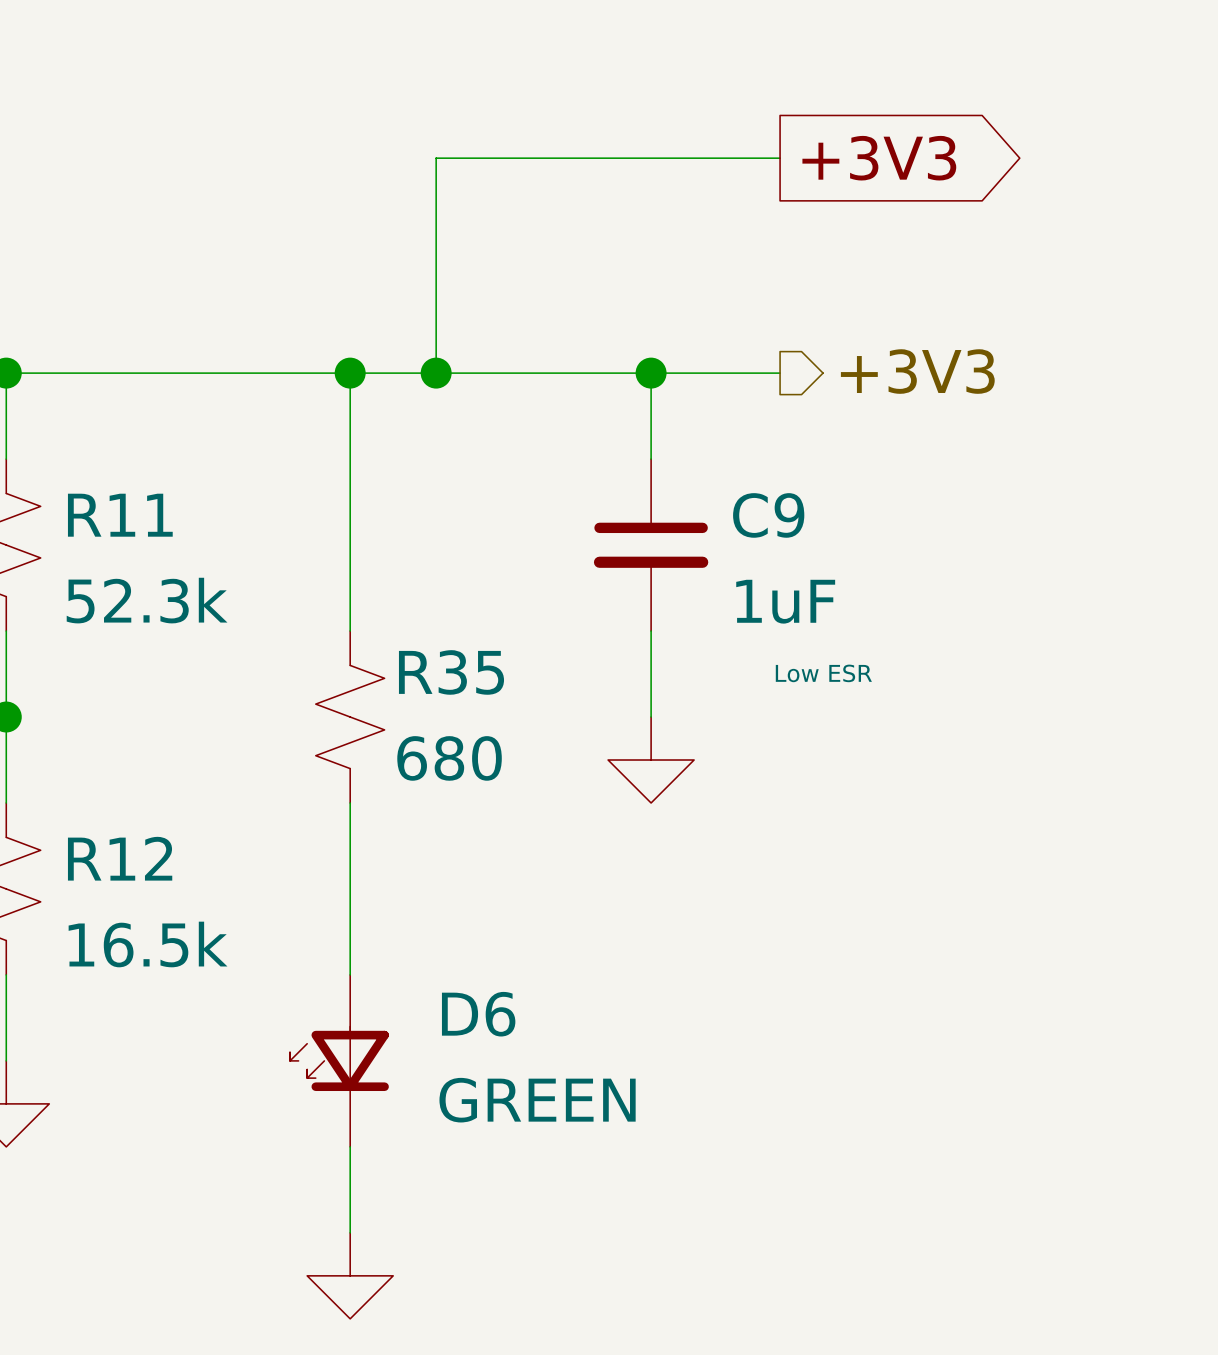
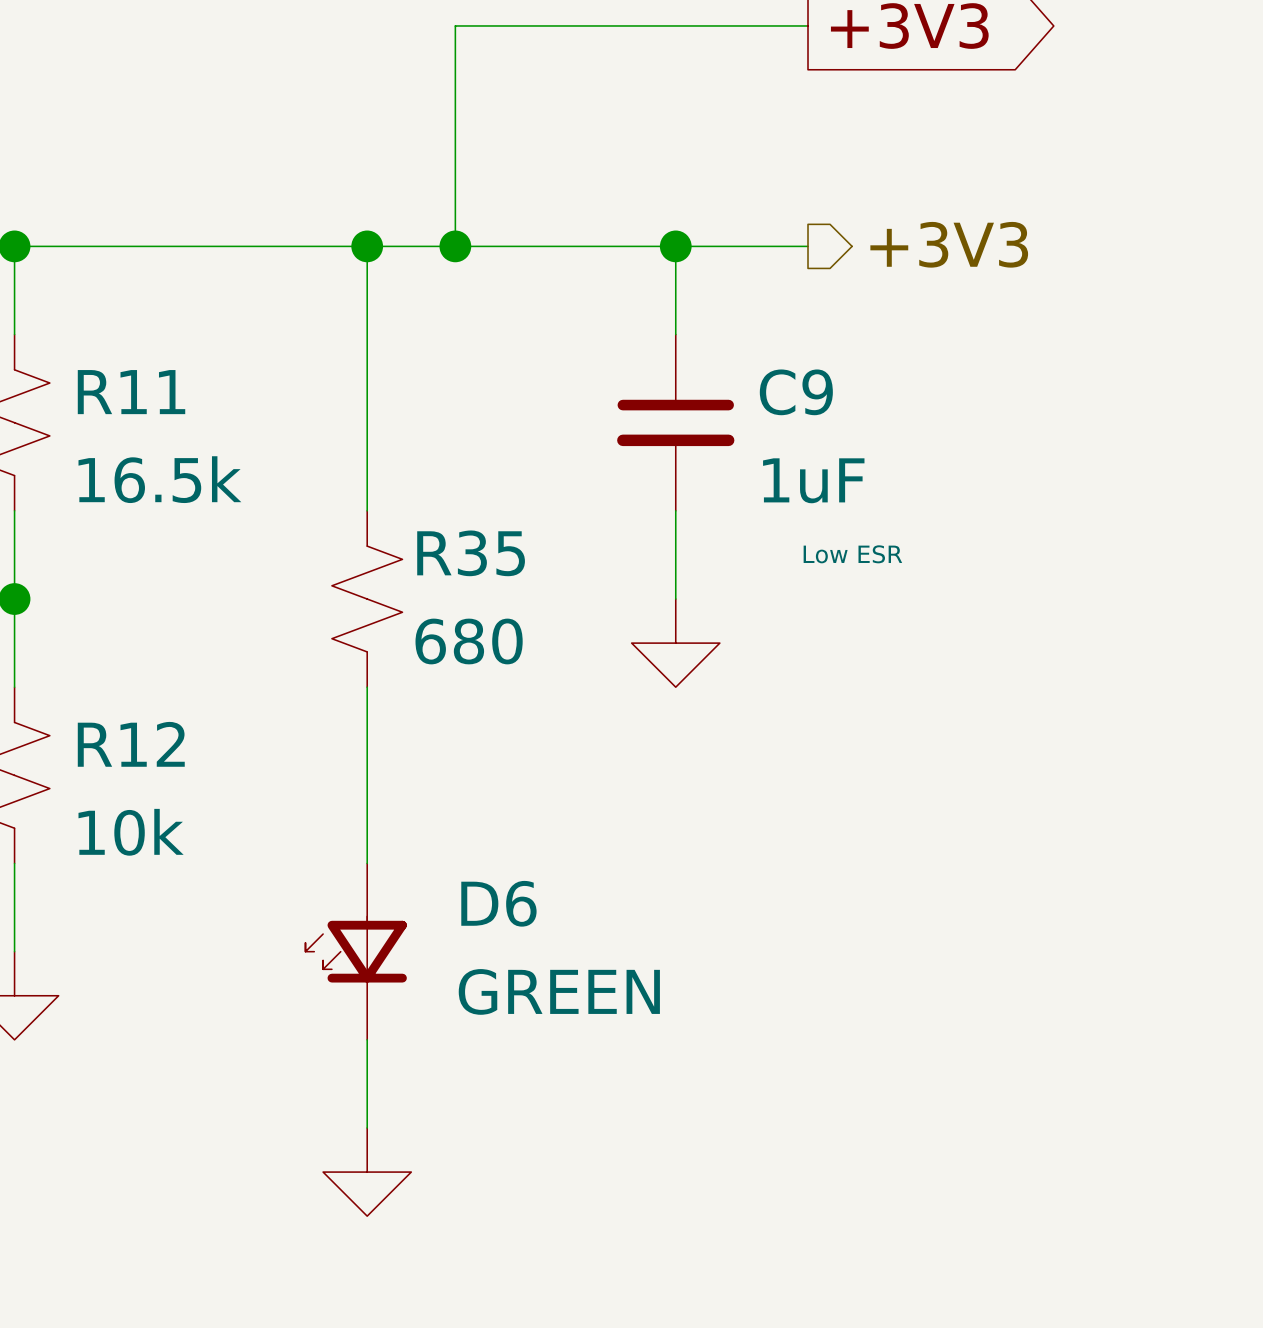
R11 value: 52.3k (147, 600) -> 16.5k (159, 479)
R12 value: 16.5k (148, 944) -> 10k (131, 832)

